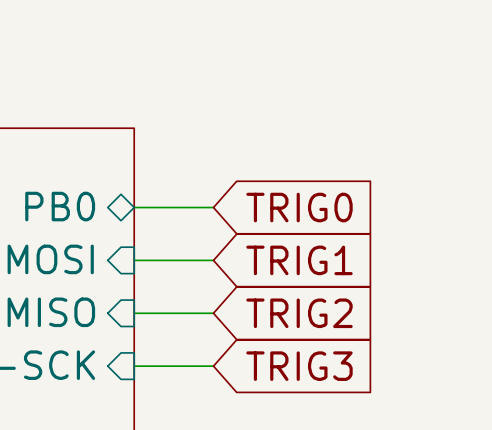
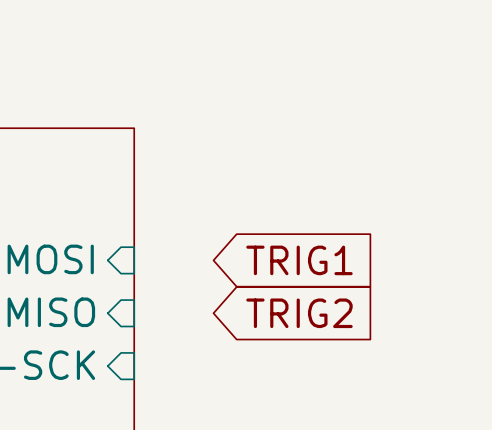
sheet pin: PB0 (60, 206) -> none
wire: (134, 207) (213, 207) -> none
global label: TRIG0 (299, 207) -> none
wire: (134, 260) (213, 260) -> none
wire: (134, 313) (213, 313) -> none
wire: (134, 366) (213, 366) -> none
global label: TRIG3 (299, 366) -> none

